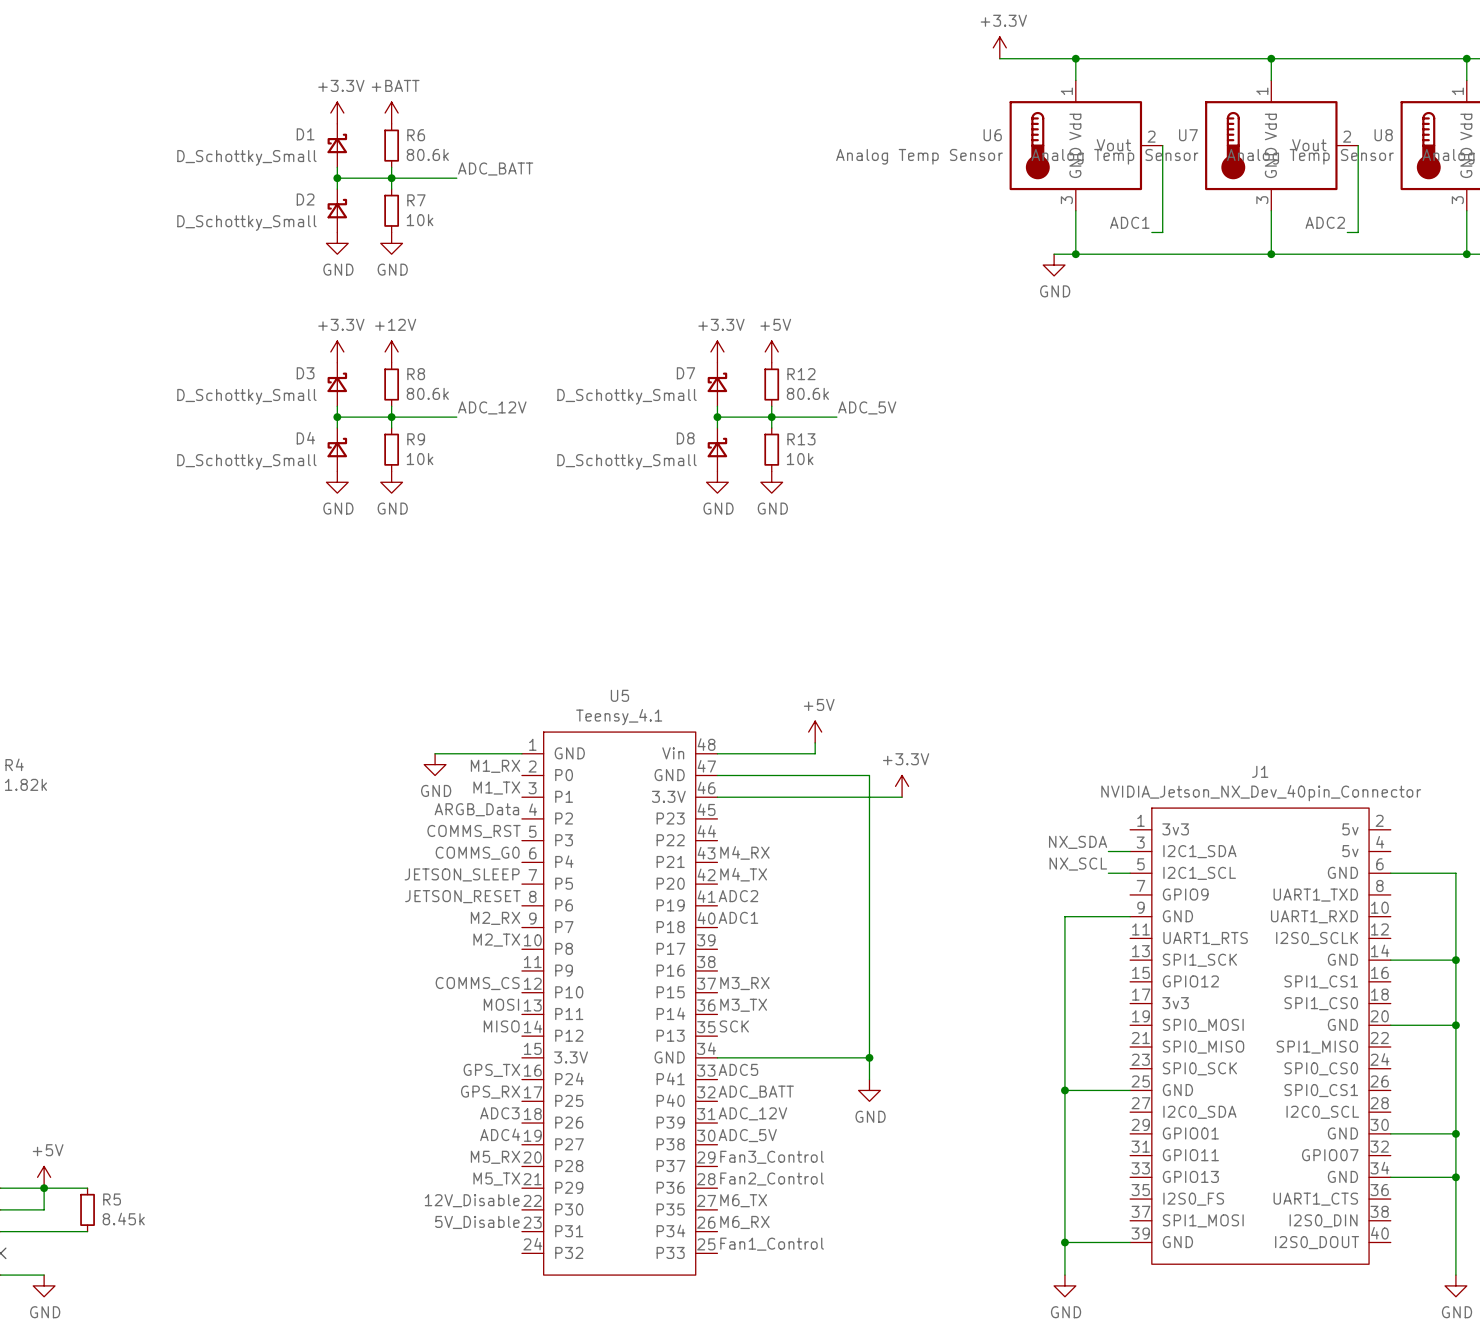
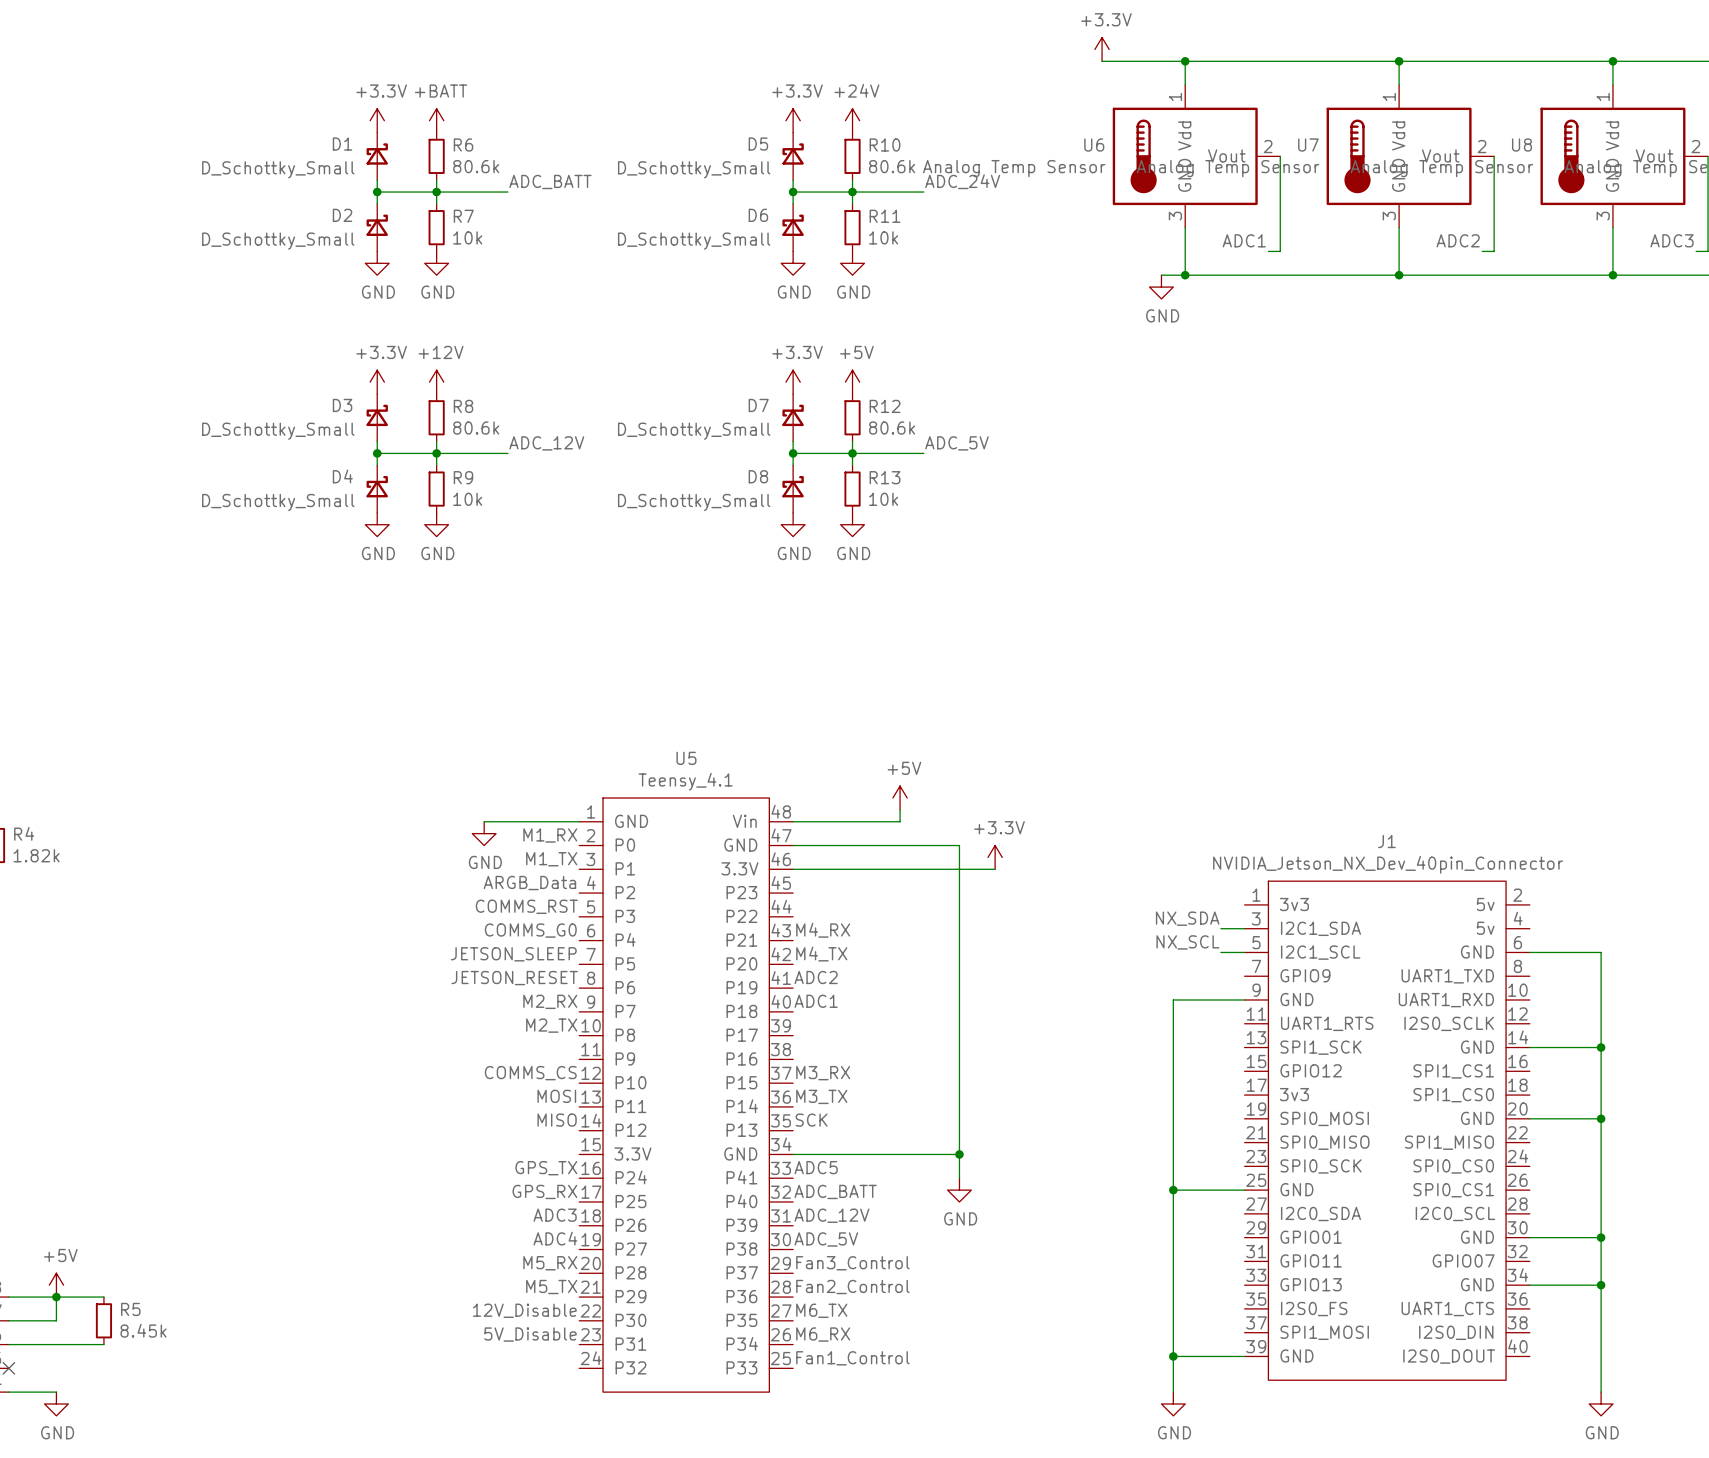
power symbol: none -> +3.3V (793, 120)
power symbol: none -> +24V (852, 120)
D5: none -> D_Schottky_Small (793, 156)
R10: none -> 80.6k (852, 156)
wire: none -> (793, 180) (793, 203)
wire: none -> (852, 180) (852, 203)
label: none -> ADC_24V (962, 181)
wire: none -> (793, 192) (923, 192)
junction: none -> (793, 192)
junction: none -> (852, 192)
D6: none -> D_Schottky_Small (793, 227)
R11: none -> 10k (852, 227)
power symbol: none -> GND (793, 263)
power symbol: none -> GND (852, 263)

